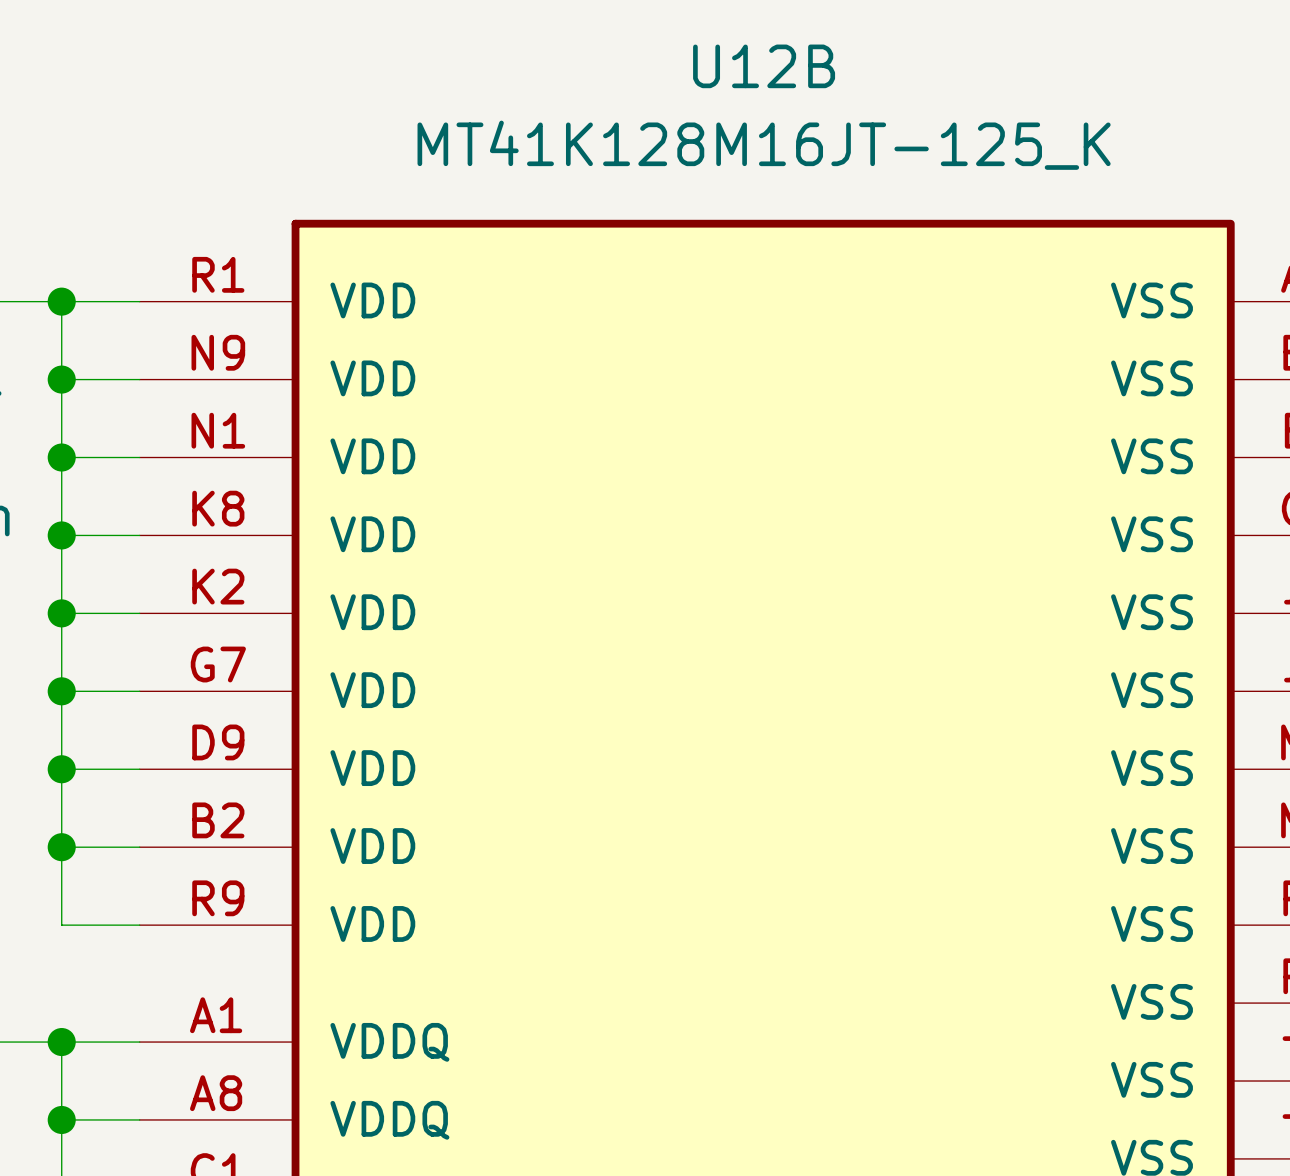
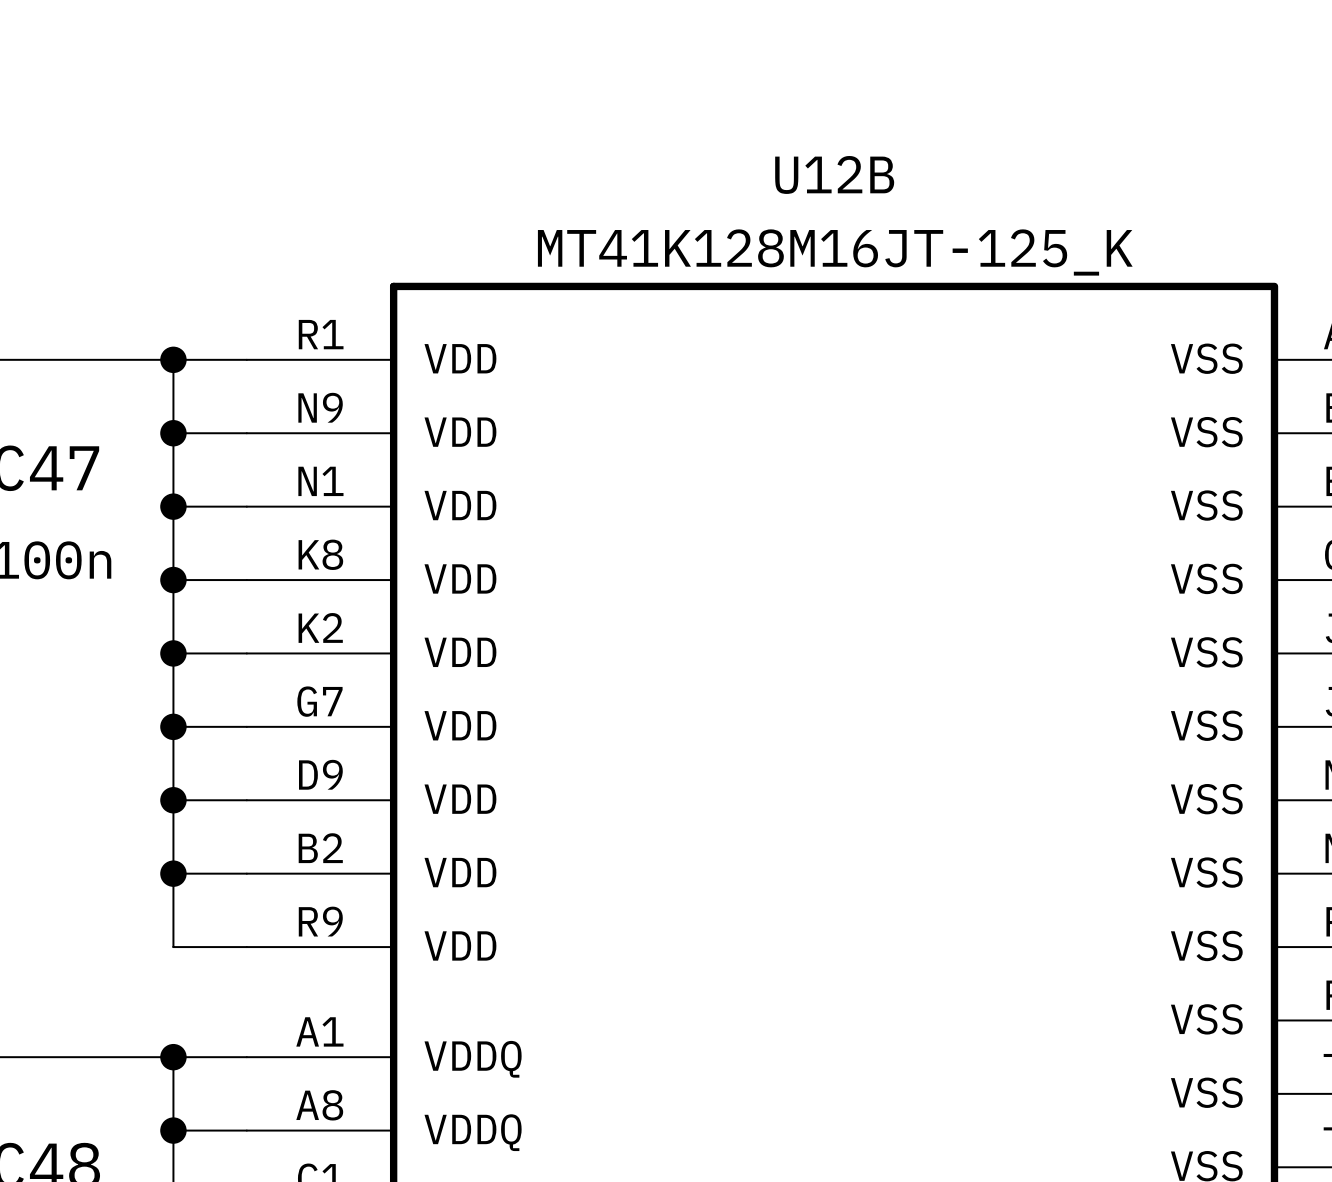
U12B name position: U12B (764, 66) -> U12B (834, 174)
U12B value position: MT41K128M16JT-125_K (764, 145) -> MT41K128M16JT-125_K (835, 252)

